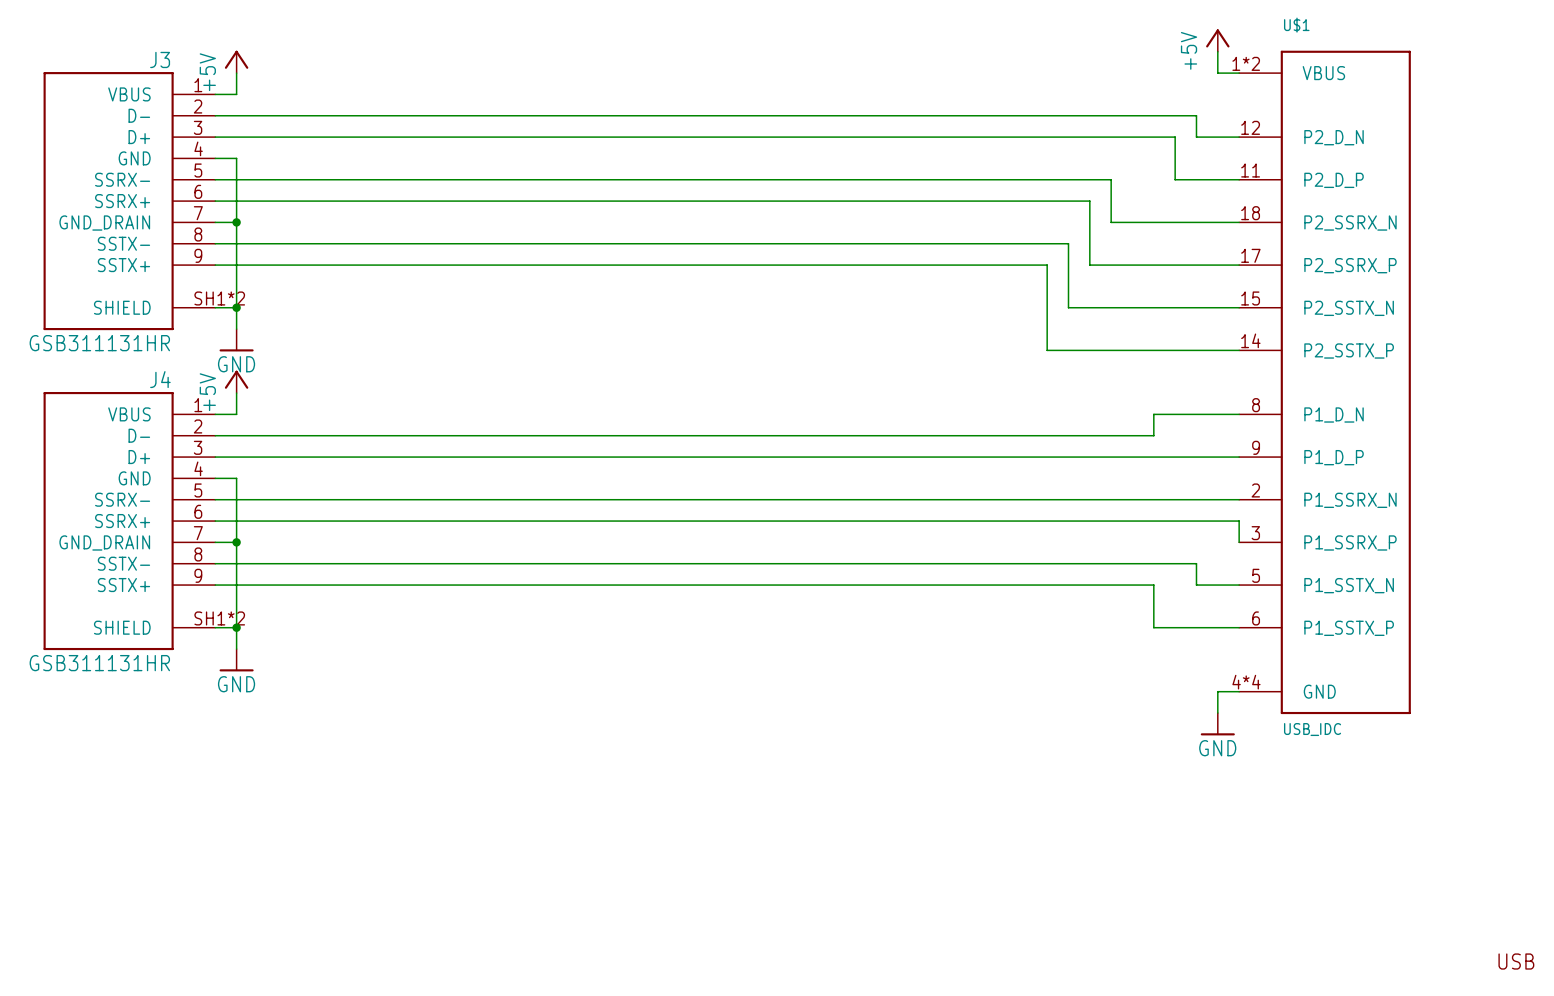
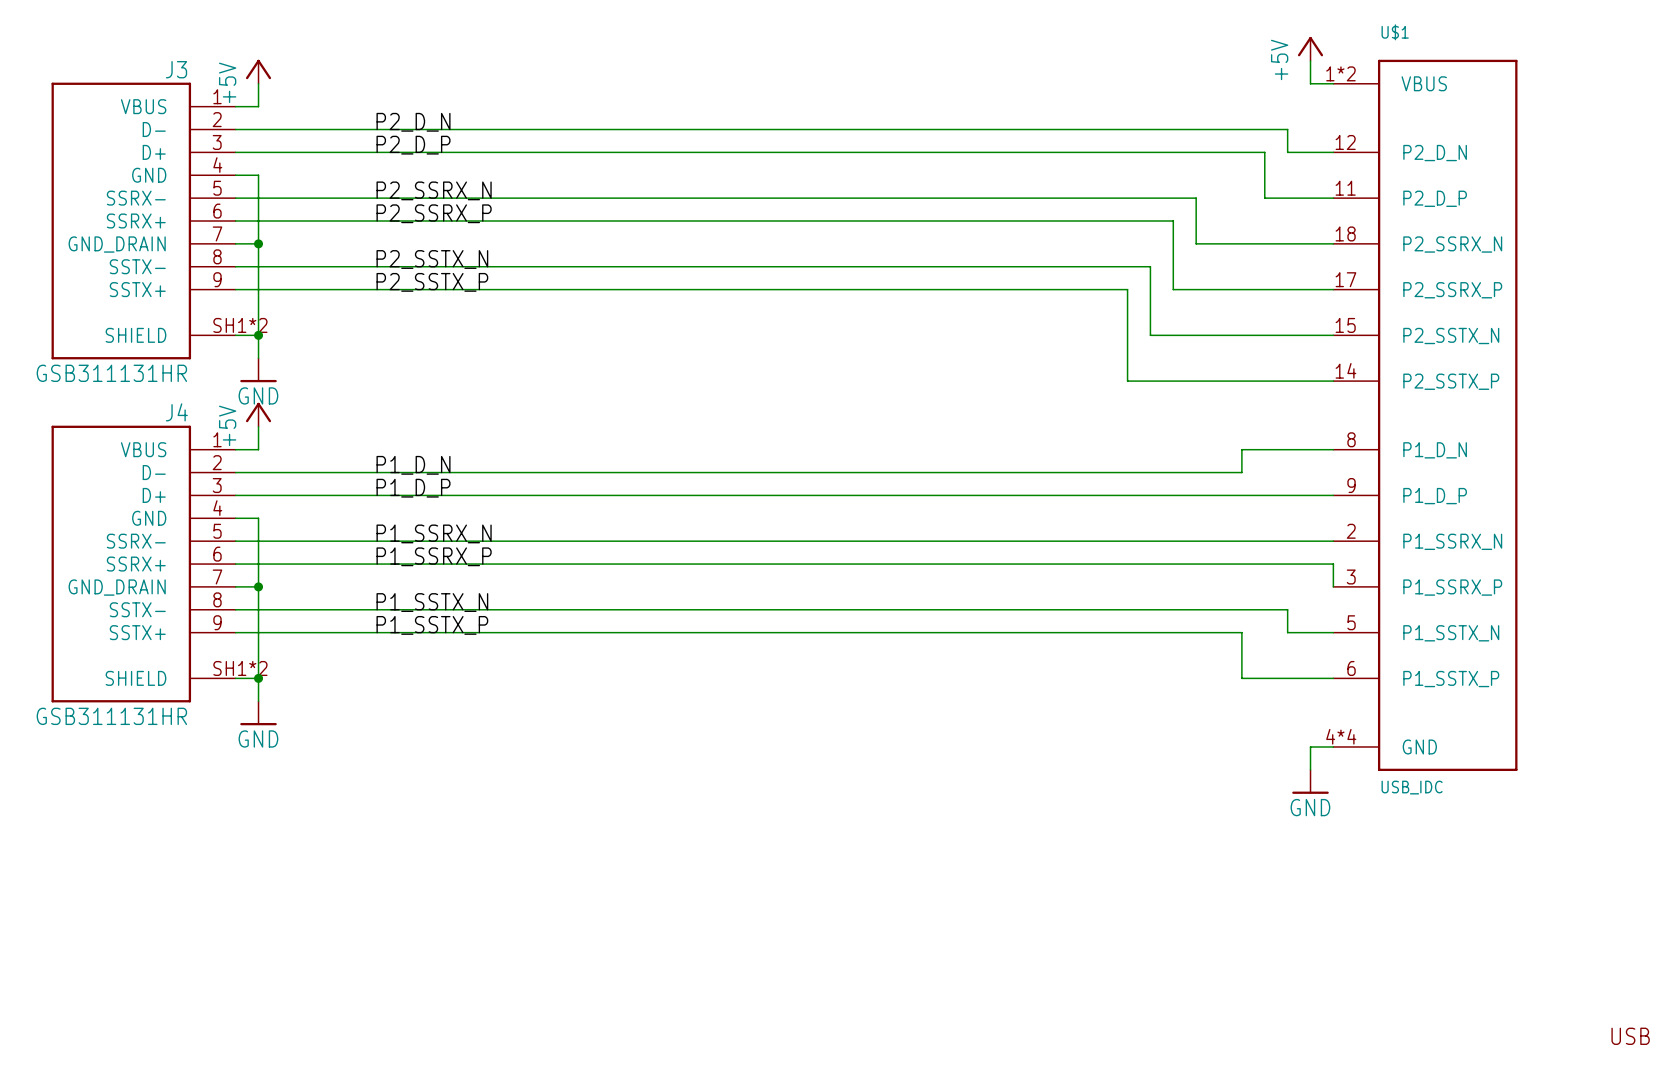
label: none -> P2_D_N (413, 122)
label: none -> P2_D_P (413, 145)
label: none -> P2_SSRX_N (434, 190)
label: none -> P2_SSRX_P (434, 213)
label: none -> P2_SSTX_N (432, 259)
label: none -> P2_SSTX_P (432, 282)
label: none -> P1_D_N (413, 465)
label: none -> P1_D_P (413, 488)
label: none -> P1_SSRX_N (434, 533)
label: none -> P1_SSRX_P (434, 556)
label: none -> P1_SSTX_N (432, 602)
label: none -> P1_SSTX_P (432, 625)

